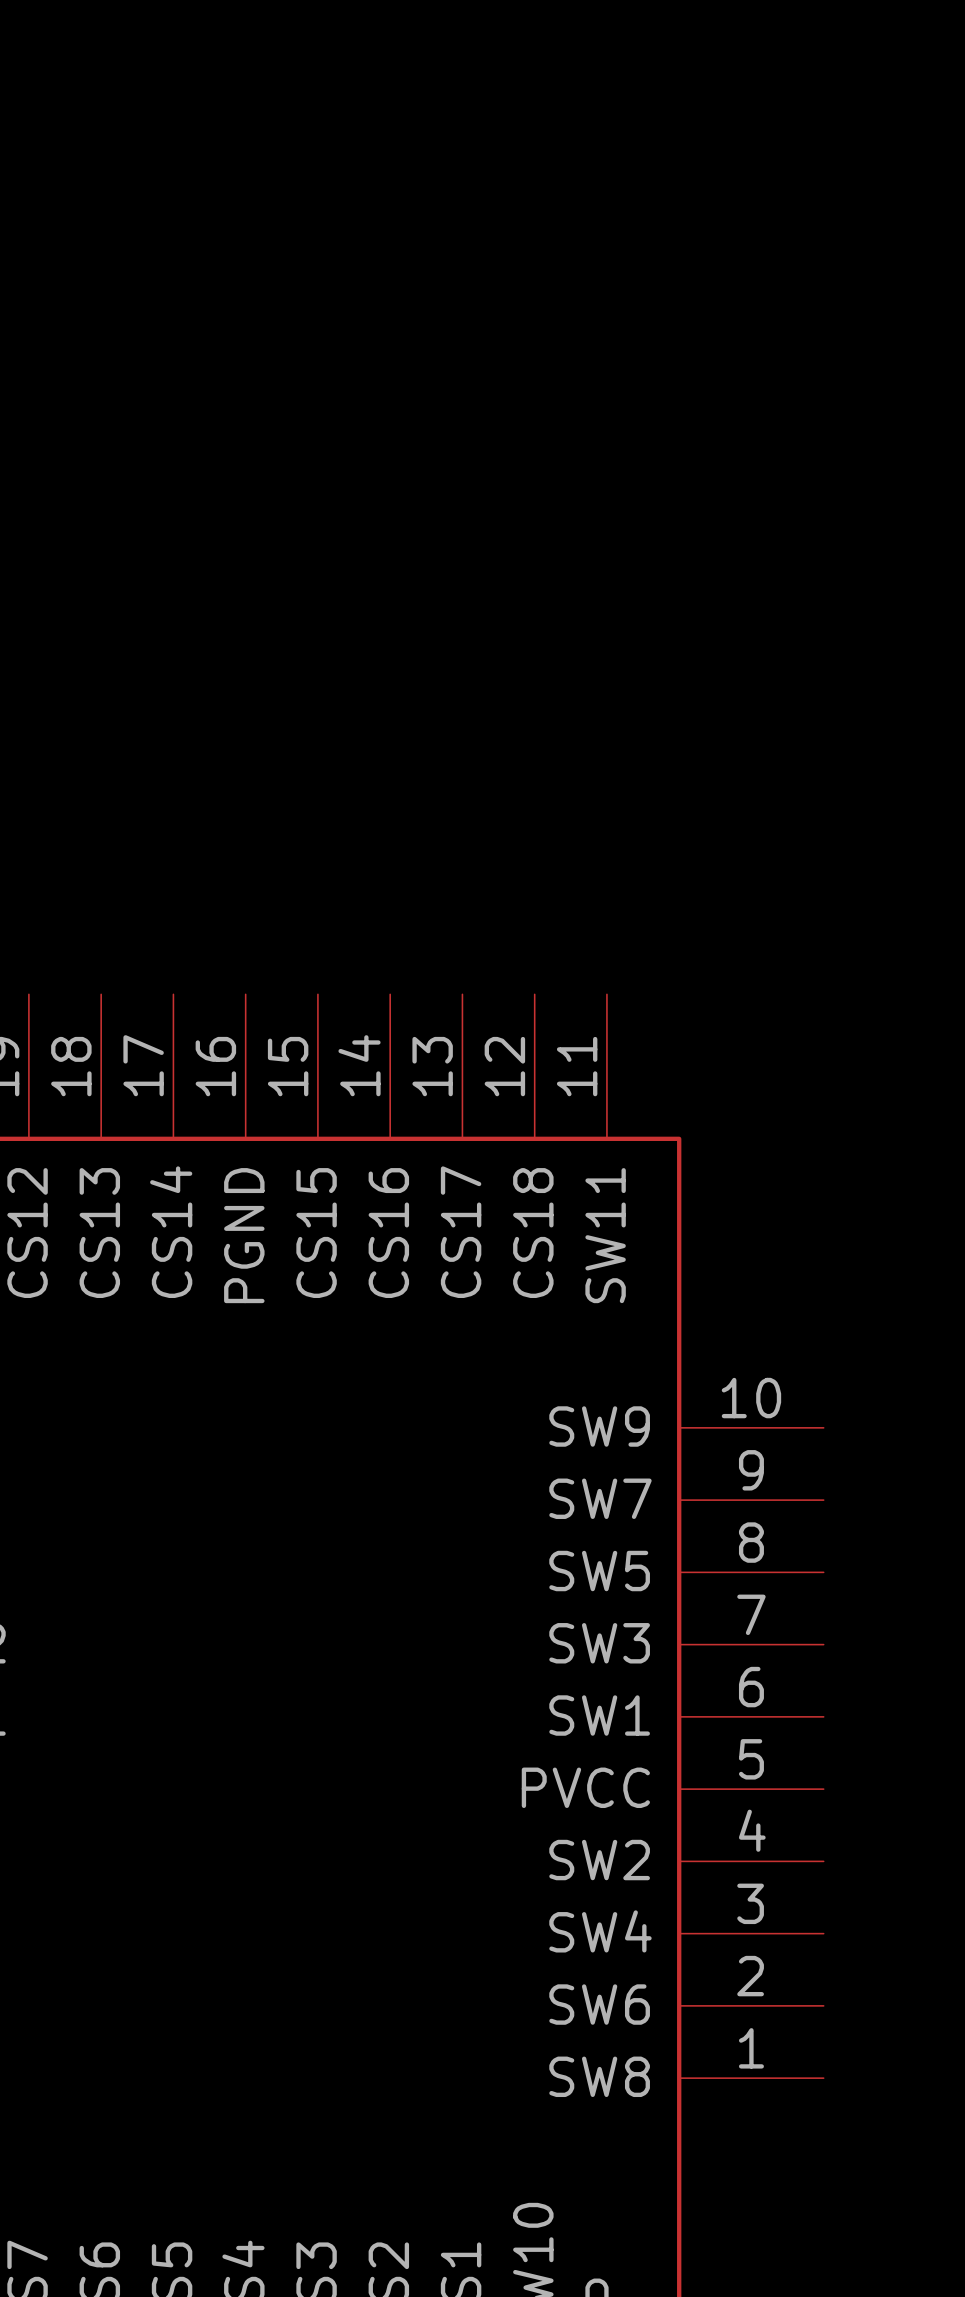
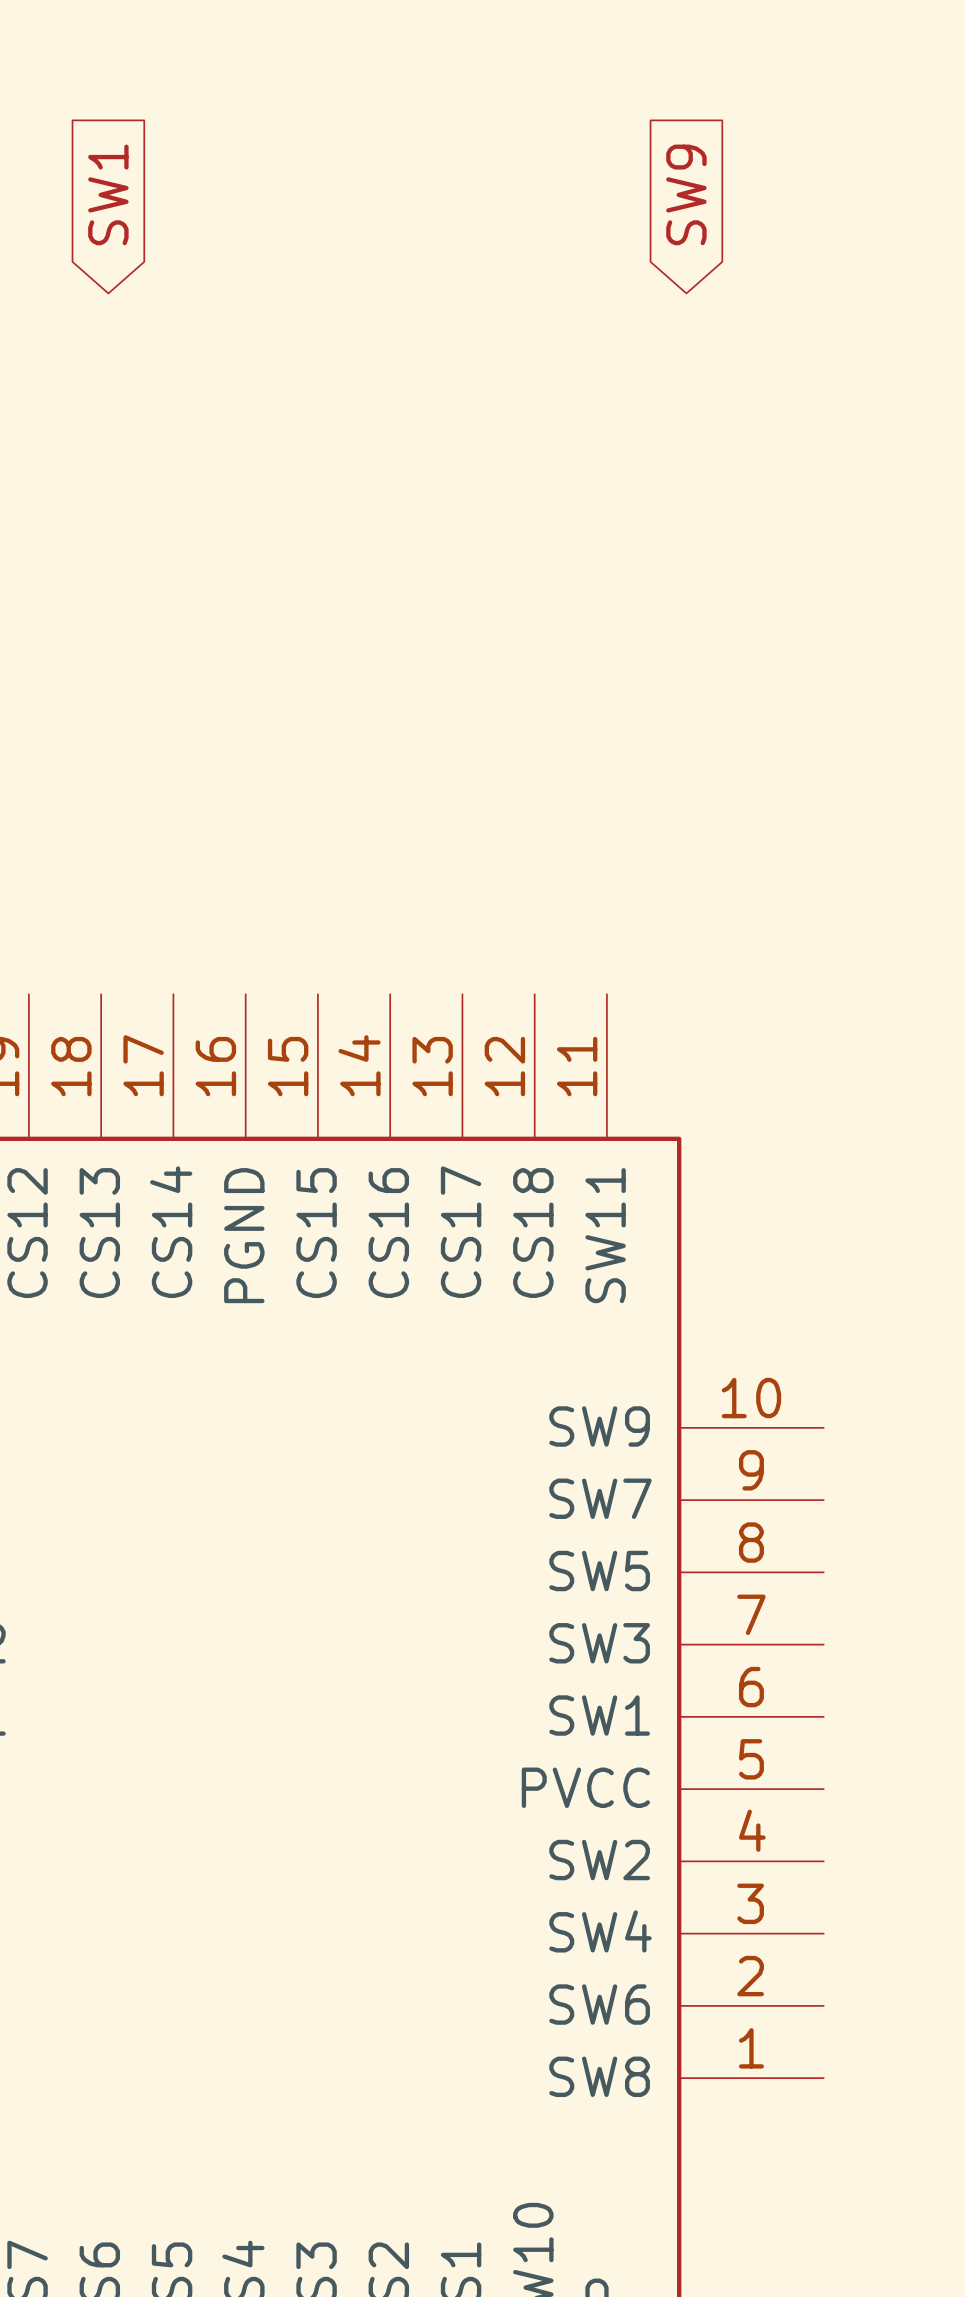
global label: none -> SW1 (108, 194)
global label: none -> SW9 (686, 194)

